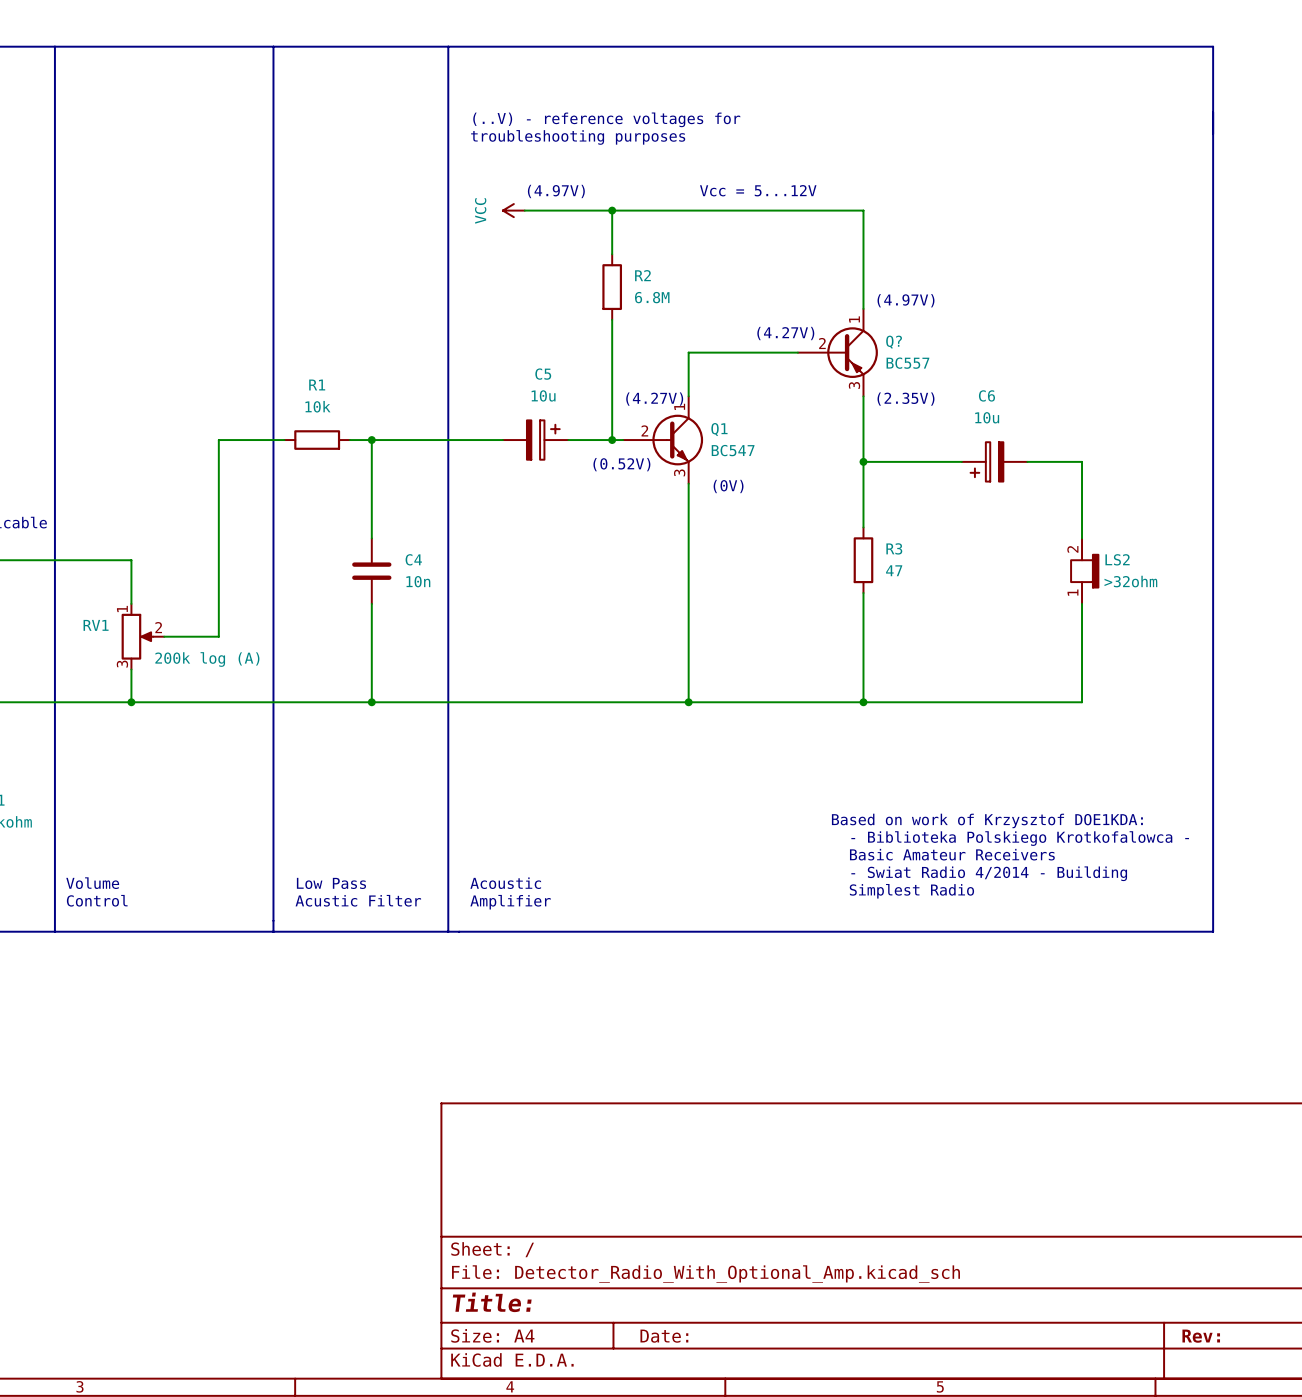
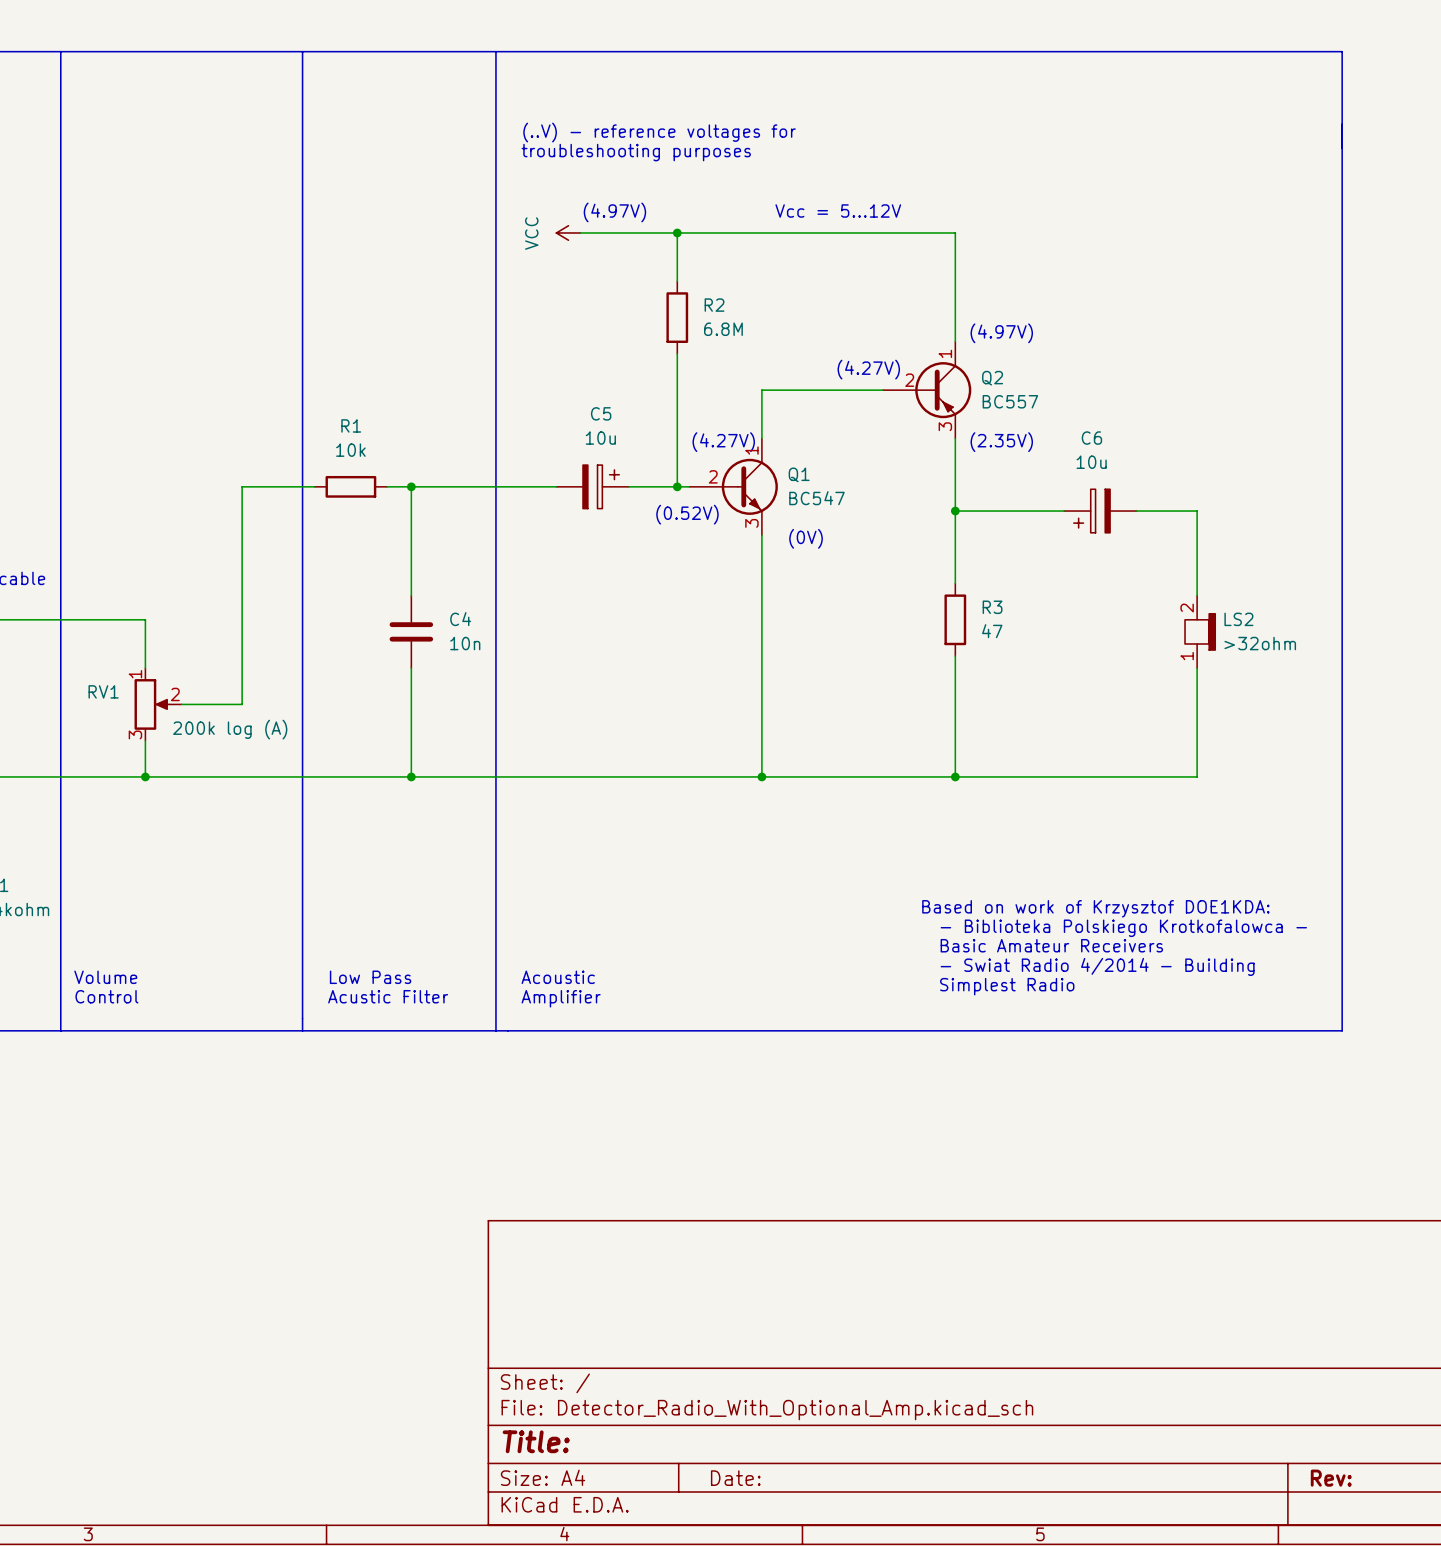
Q? name: Q? (894, 342) -> Q2 (992, 378)

